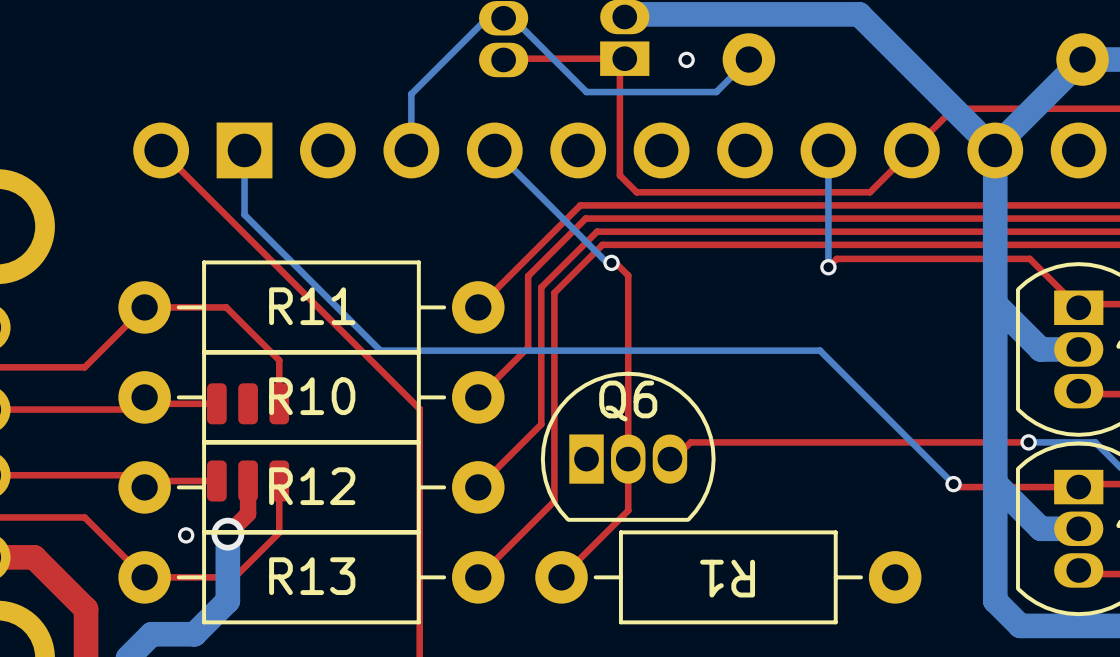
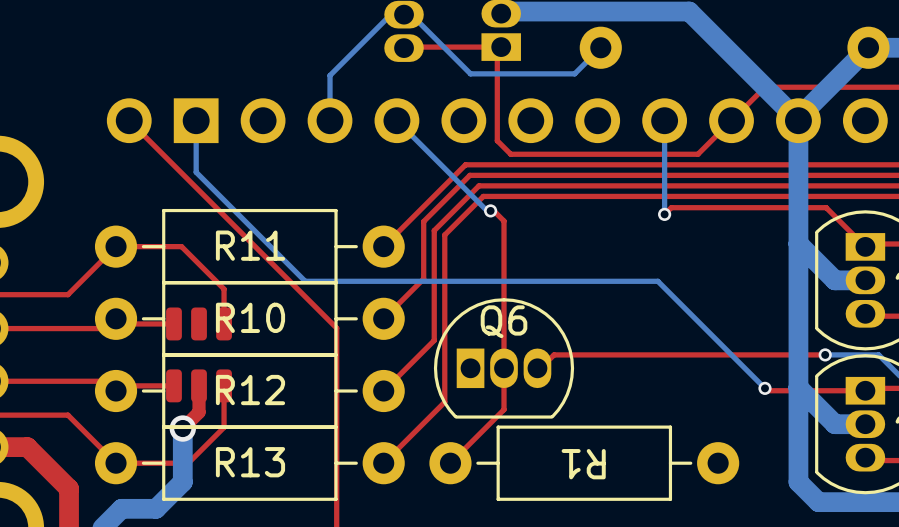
via: (686, 59) -> none
via: (186, 535) -> none

